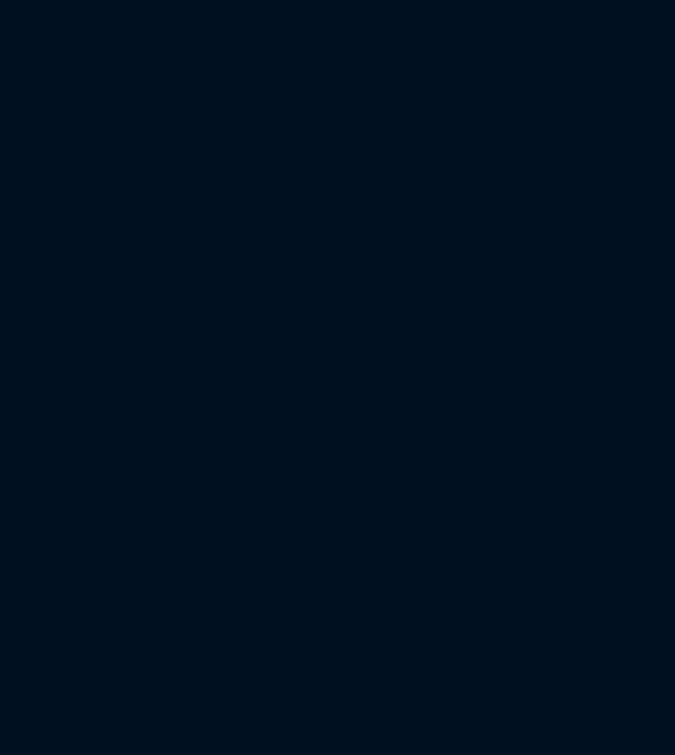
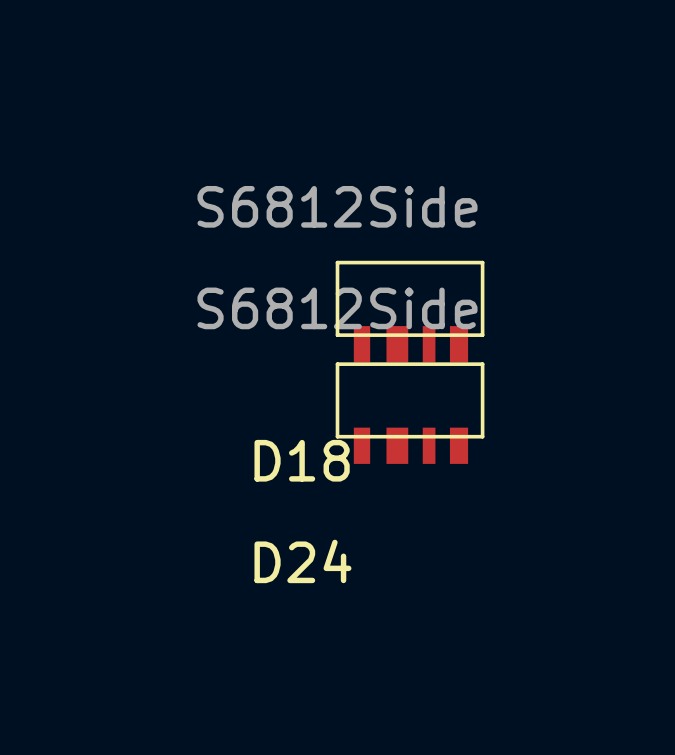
D18: none -> S6812Side (410, 311)
D24: none -> S6812Side (410, 413)

